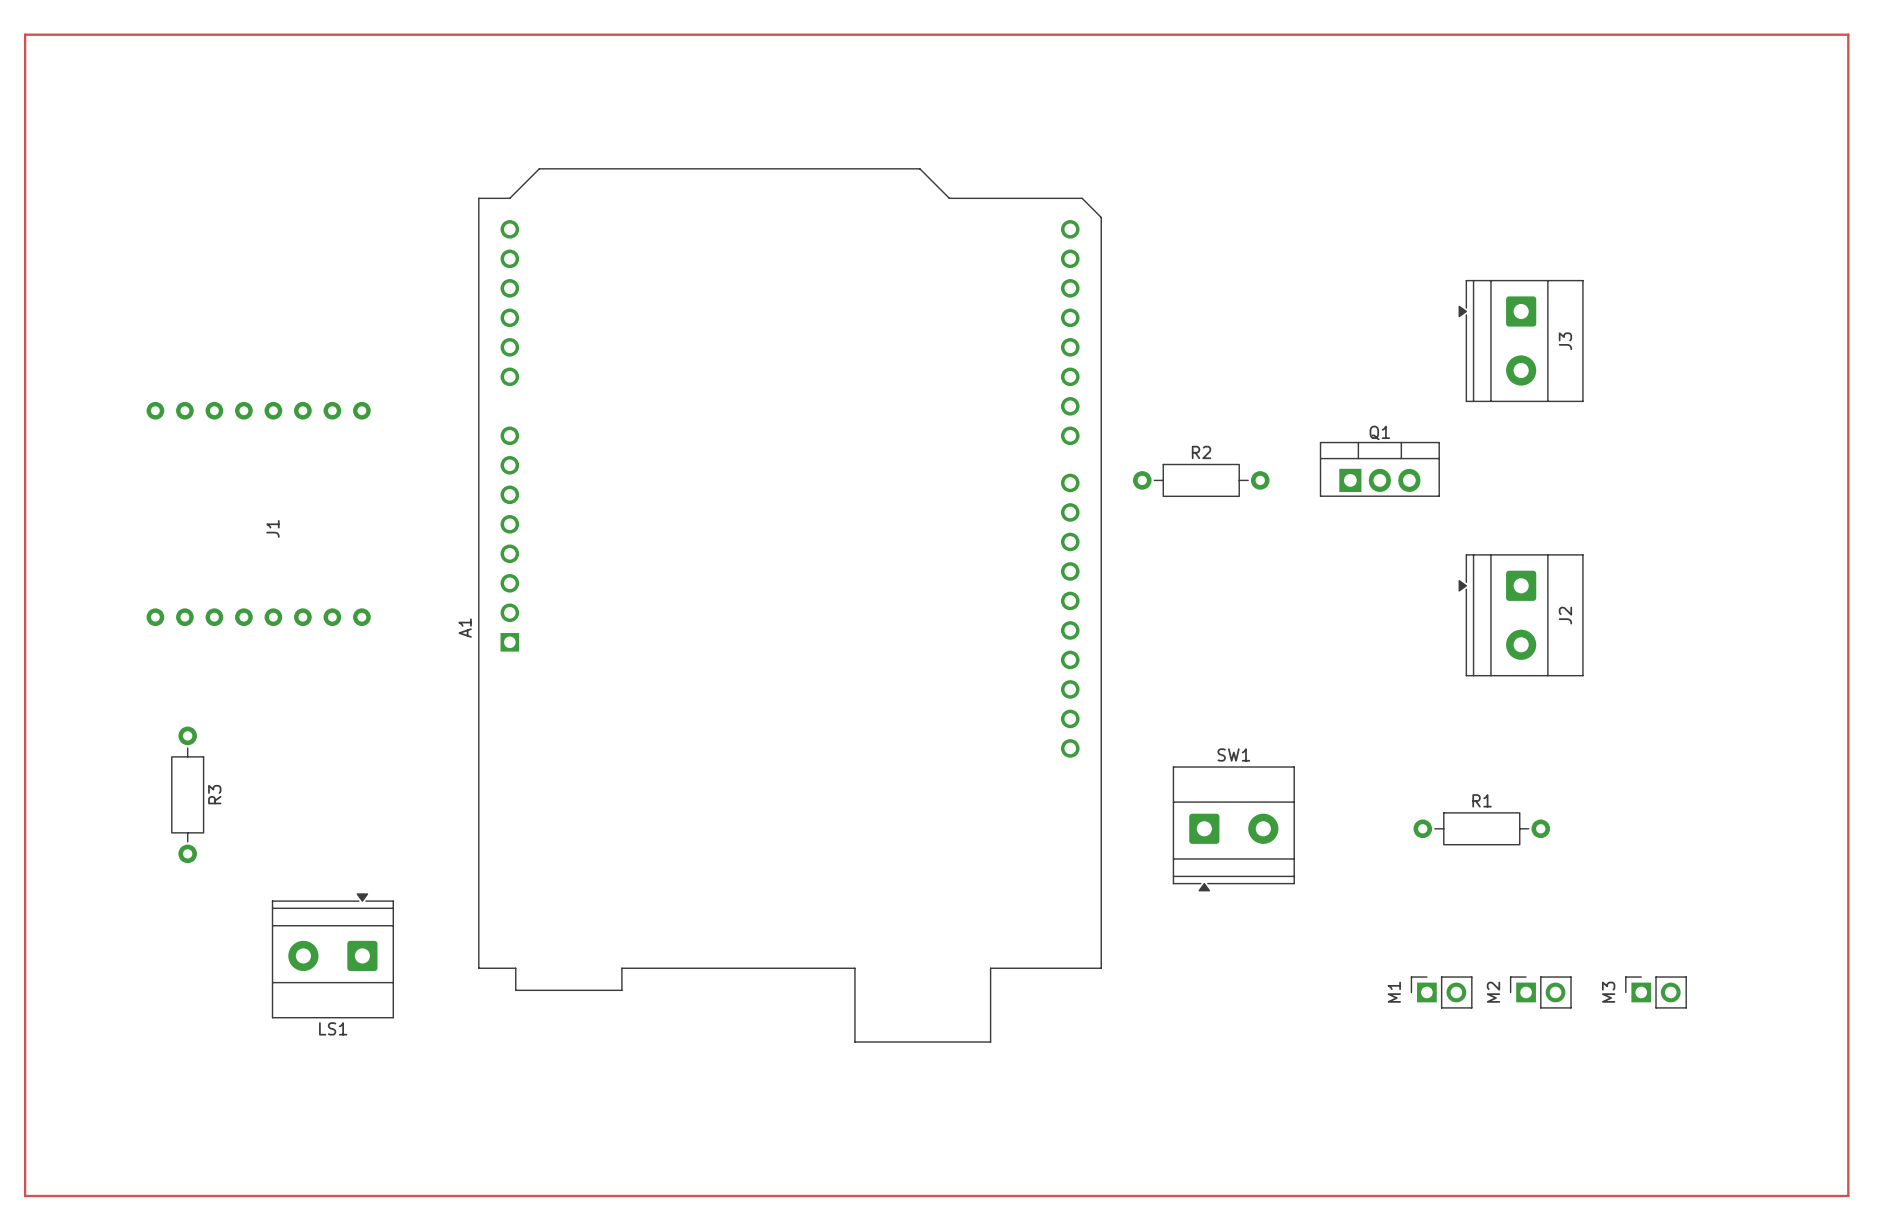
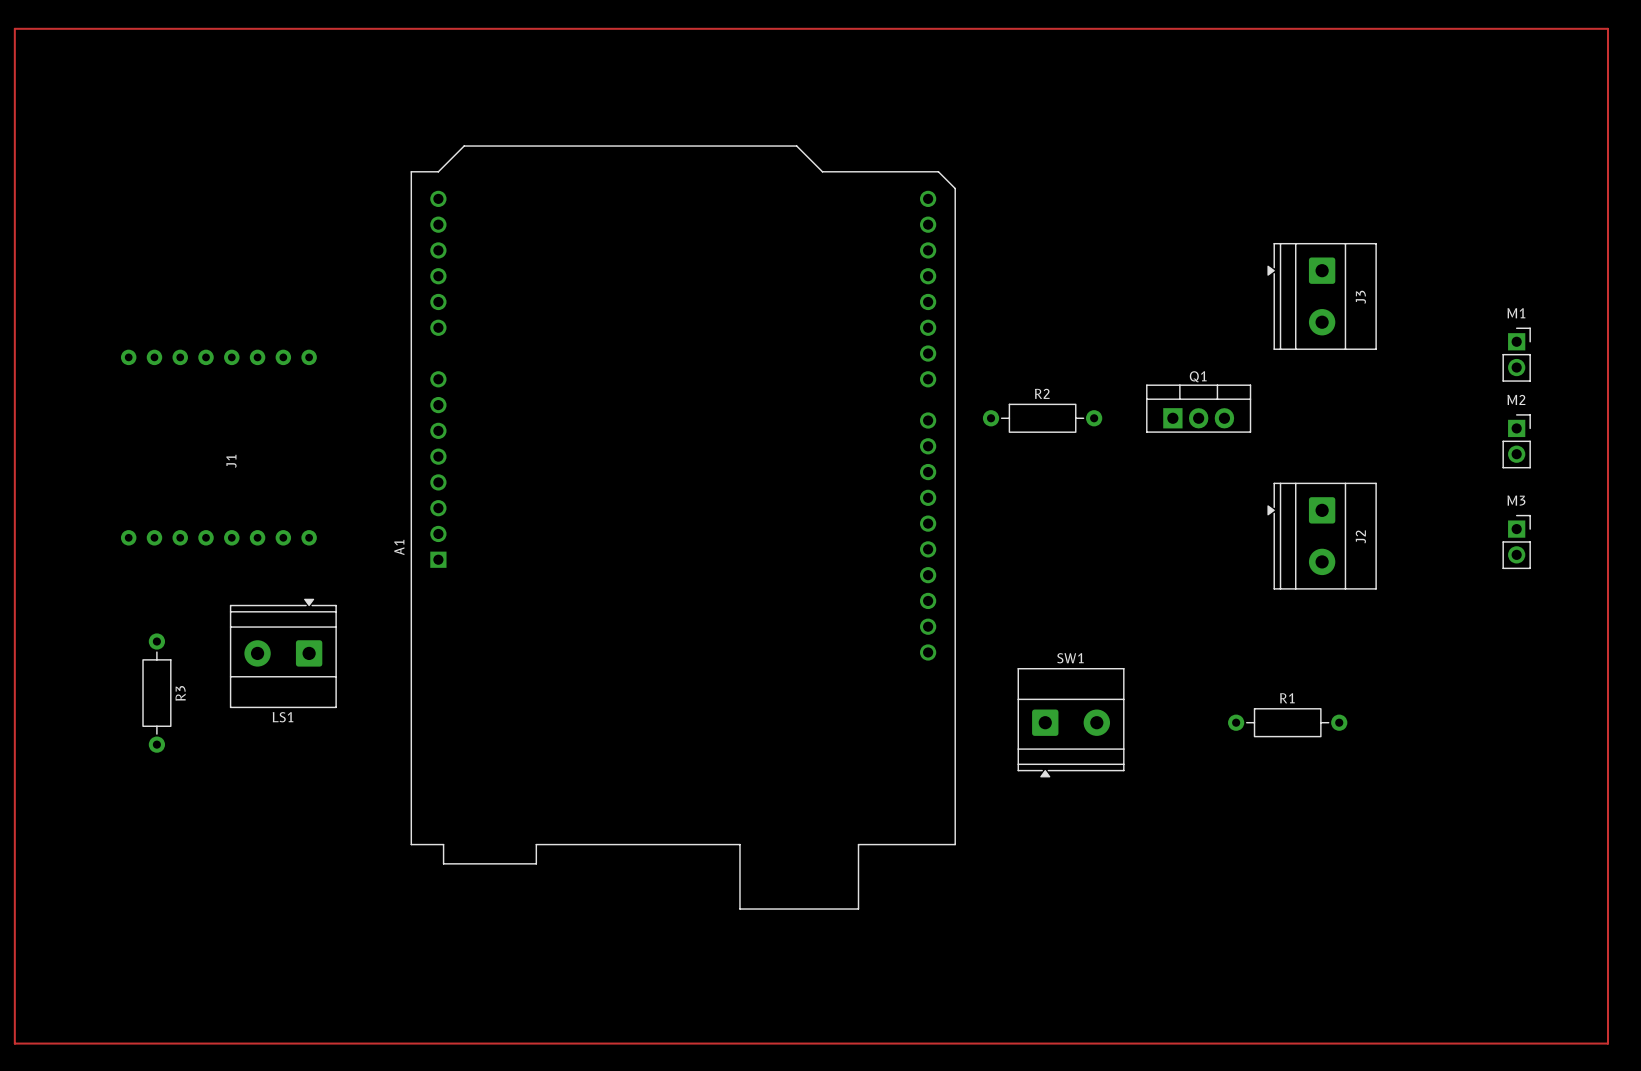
LS1 position: (332, 955) -> (283, 653)
M1 rotation: 0° (1441, 992) -> 90° clockwise (1516, 354)
M1 position: (1441, 992) -> (1516, 354)
M2 rotation: 0° (1540, 992) -> 90° clockwise (1516, 441)
M2 position: (1540, 992) -> (1516, 441)
M3 rotation: 0° (1656, 992) -> 90° clockwise (1516, 541)
M3 position: (1656, 992) -> (1516, 541)

